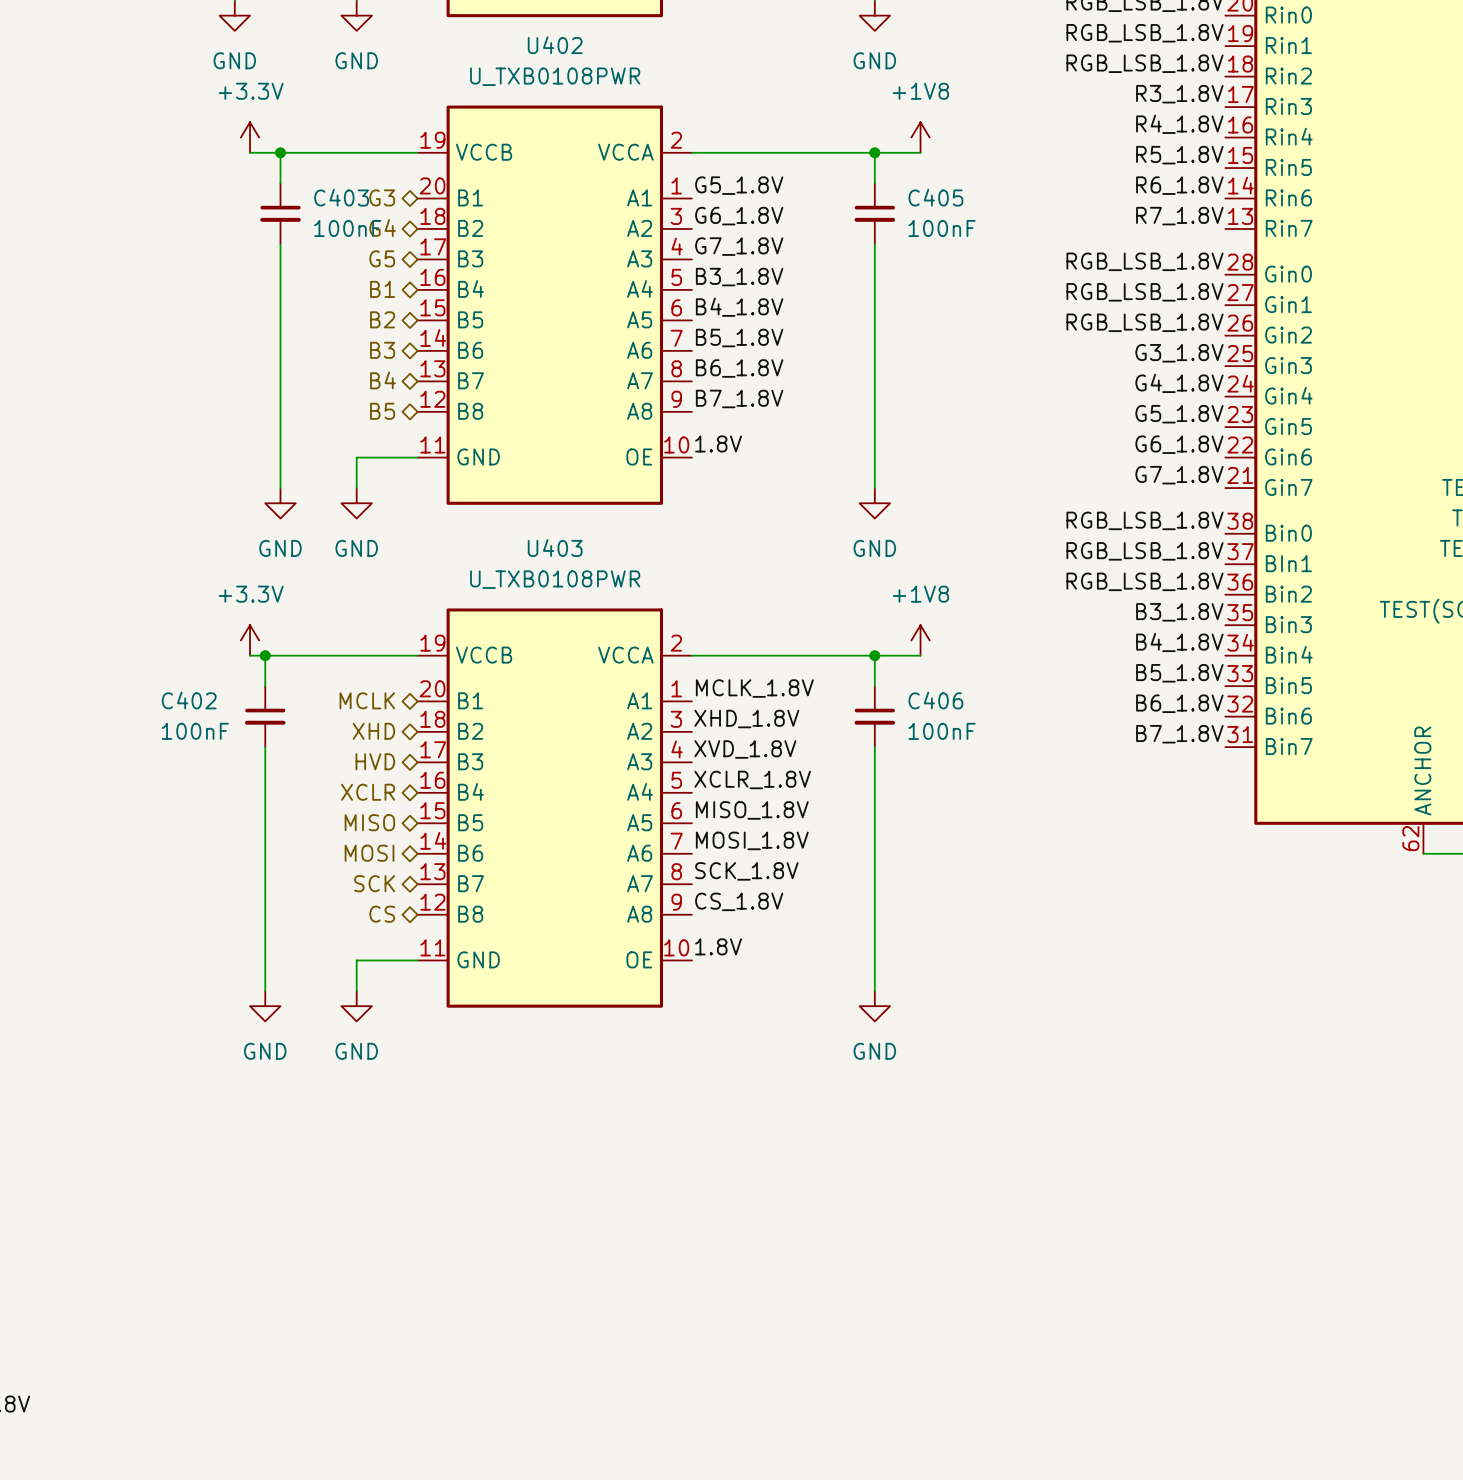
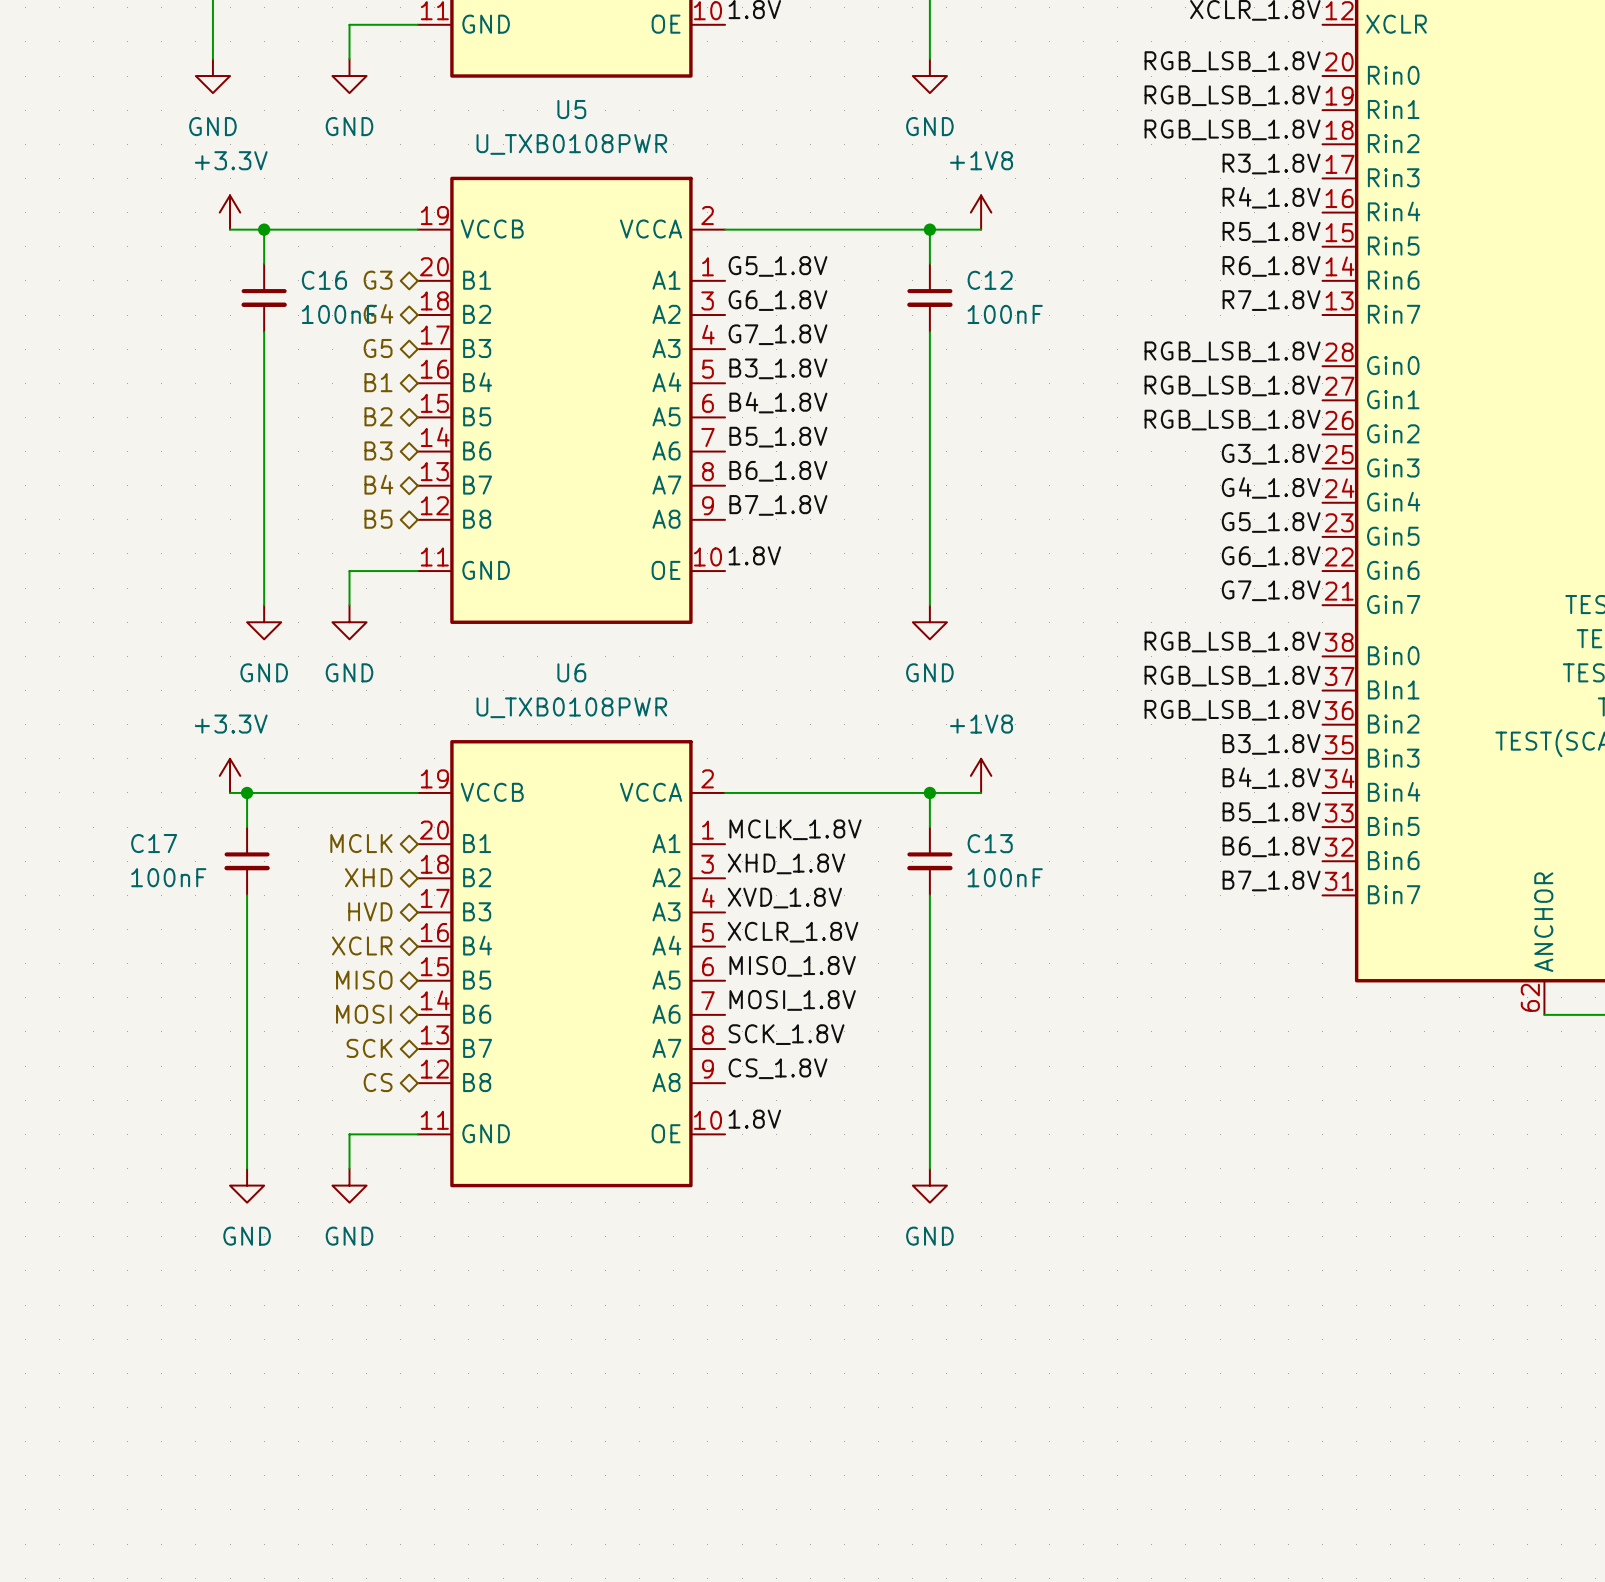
U402 name: U402 (555, 45) -> U5 (571, 109)
C403 name: C403 (341, 197) -> C16 (324, 280)
C405 name: C405 (935, 197) -> C12 (990, 280)
U403 name: U403 (555, 548) -> U6 (571, 672)
C402 name: C402 (189, 700) -> C17 (154, 843)
C406 name: C406 (935, 700) -> C13 (990, 843)

